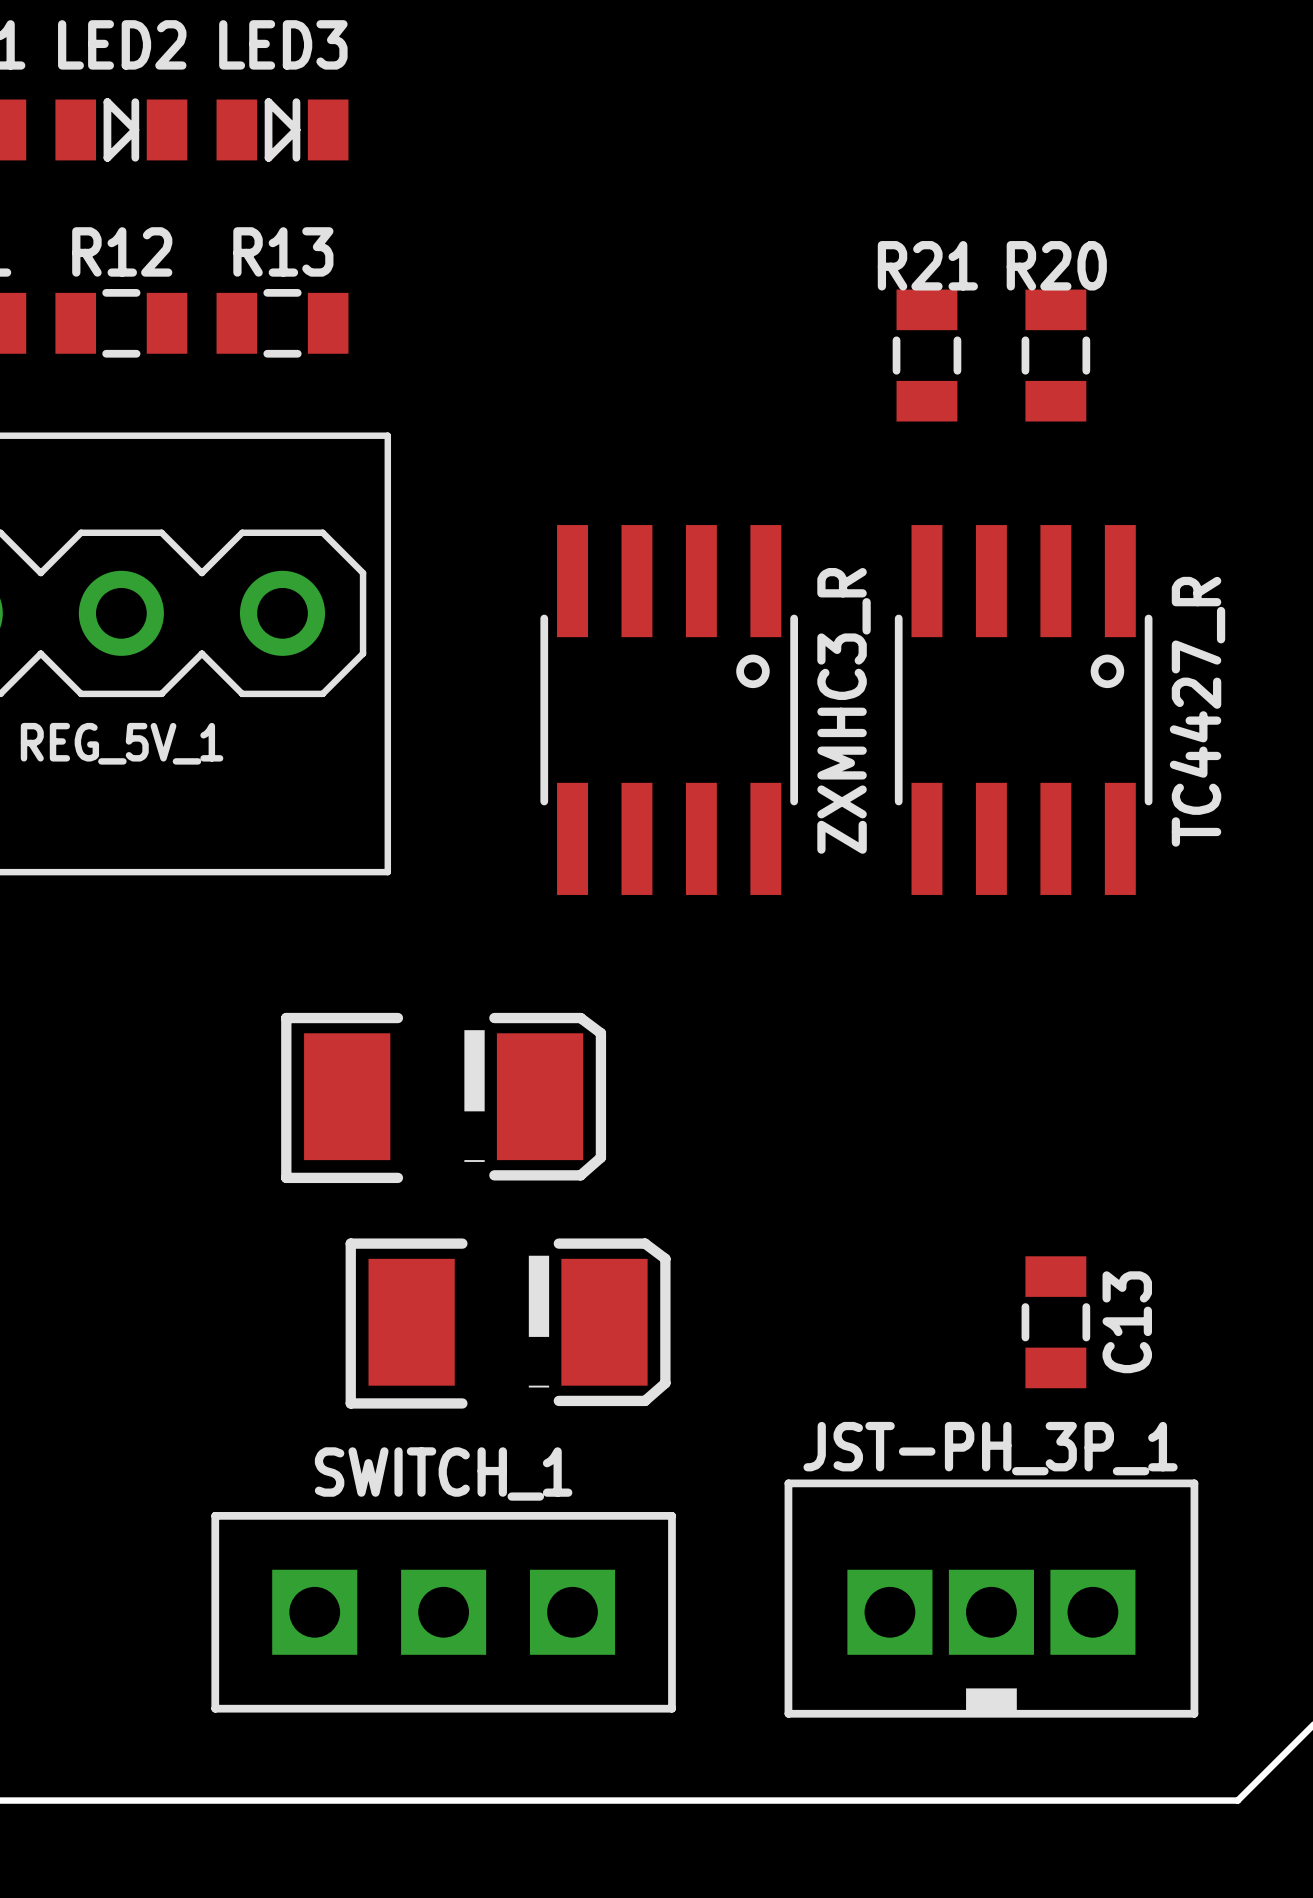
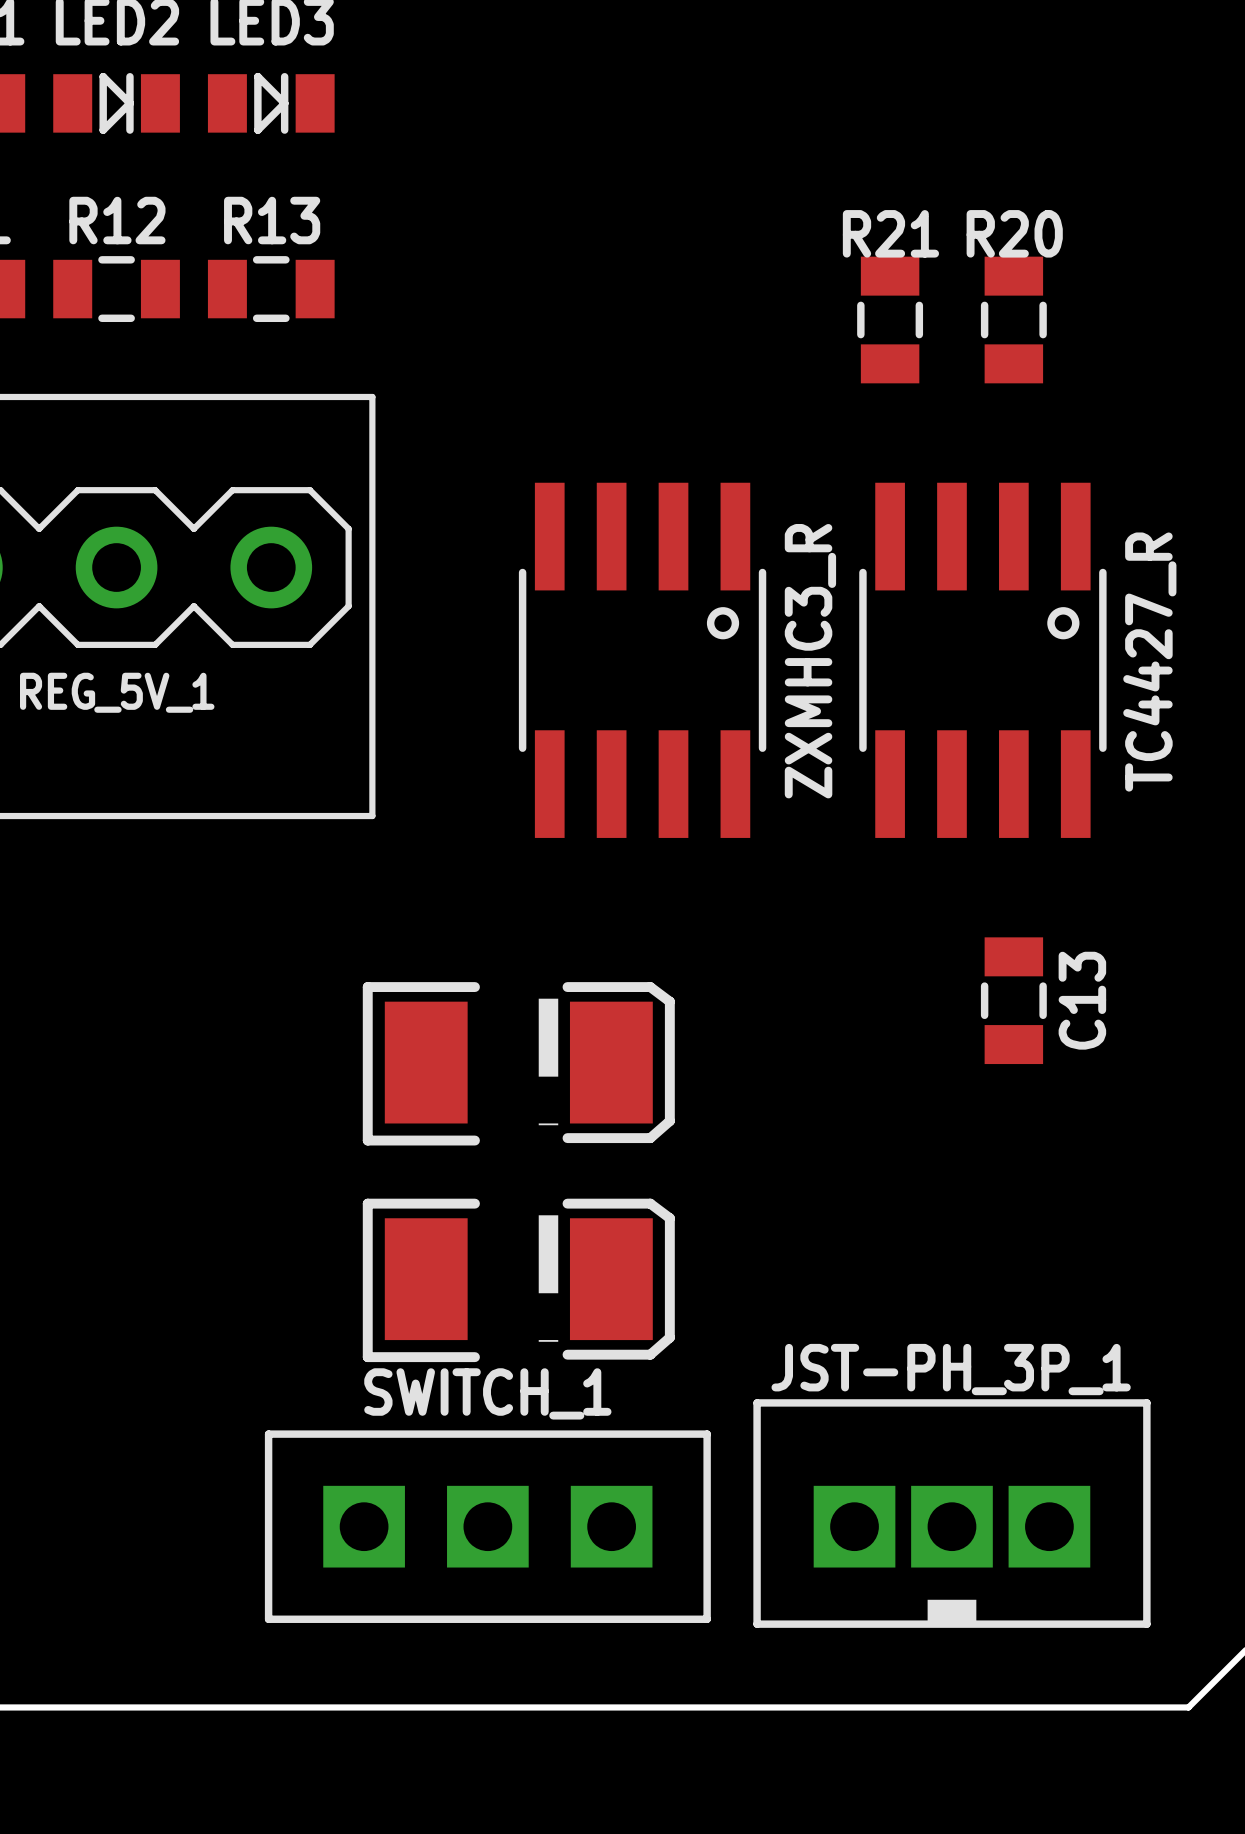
part position: (443, 1097) -> (518, 1063)
C13 position: (1055, 1322) -> (1013, 1000)
part position: (508, 1323) -> (518, 1280)
SWITCH_1 position: (443, 1612) -> (487, 1526)

